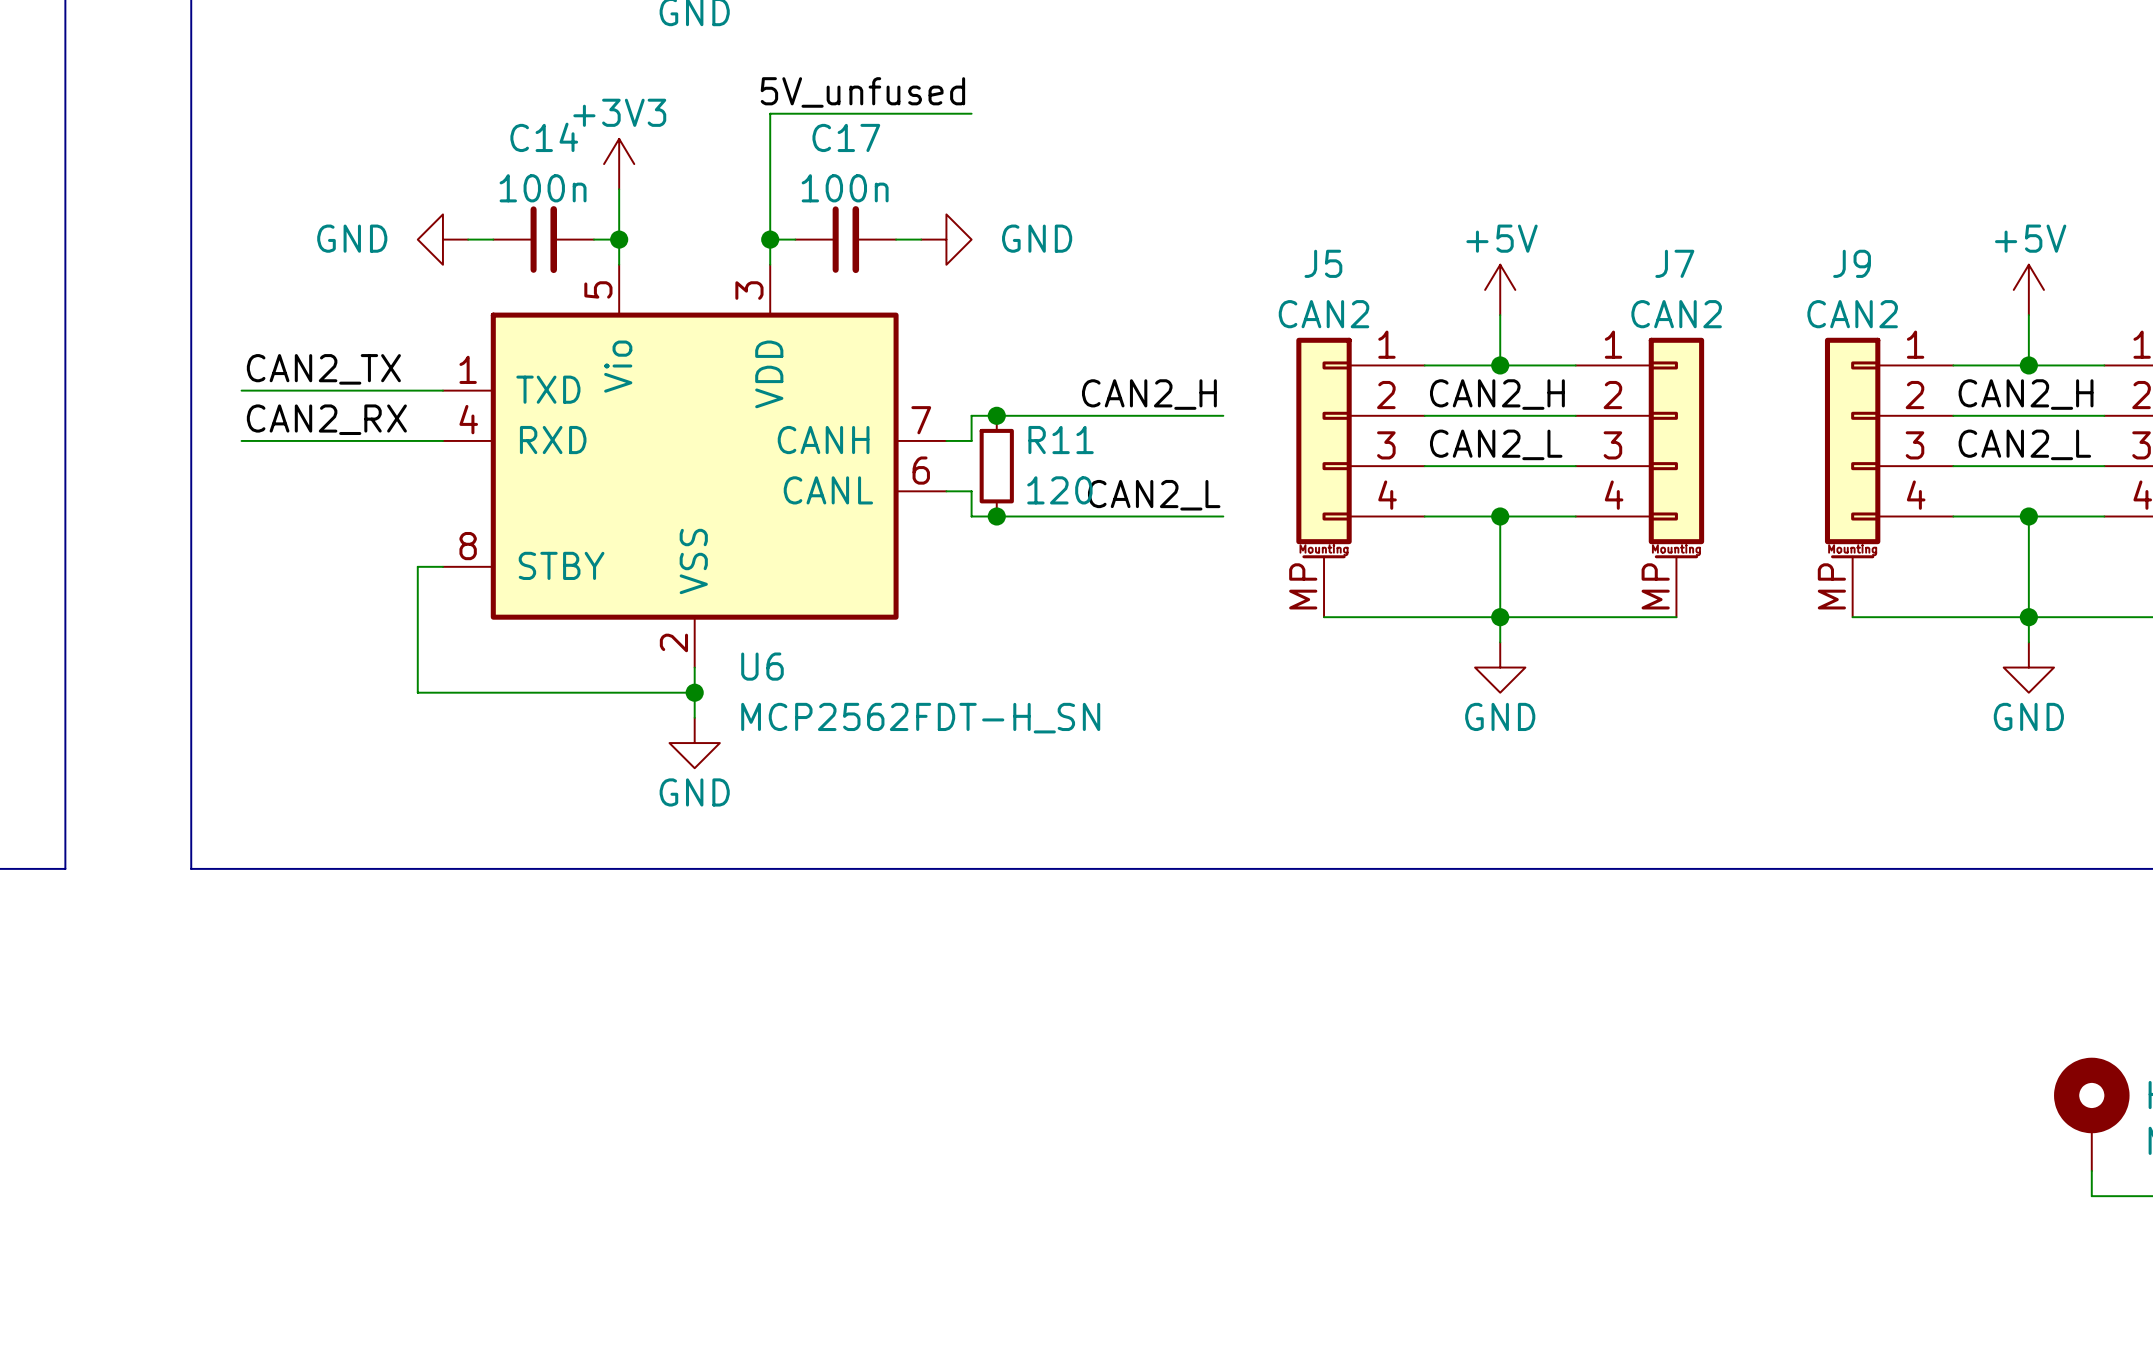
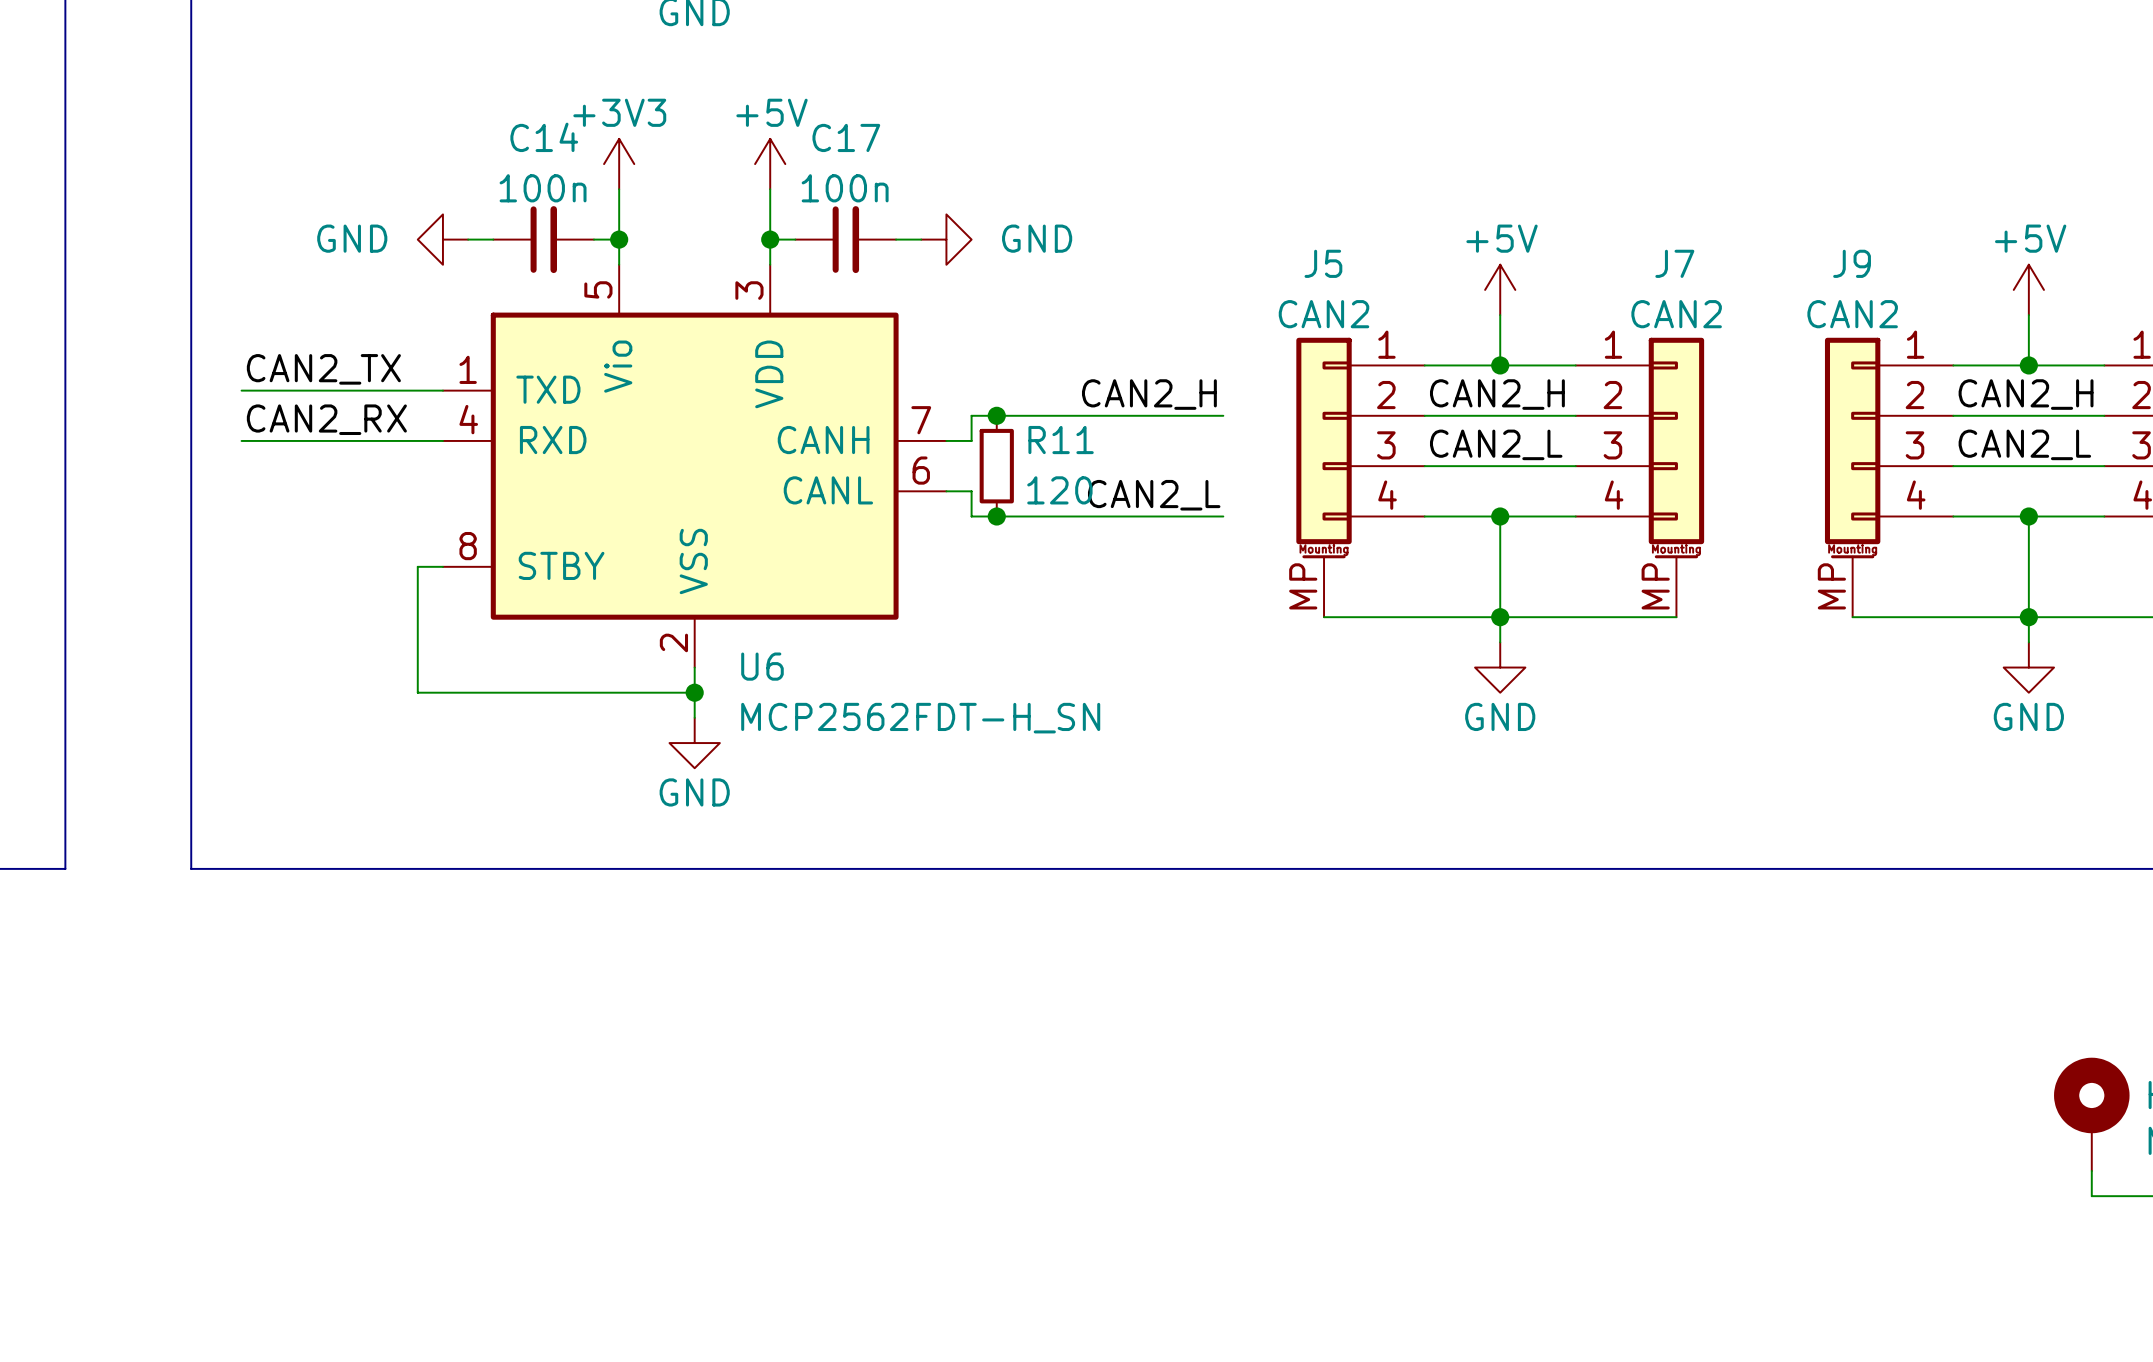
label: 5V_unfused (862, 92) -> none
wire: (971, 113) (770, 113) (770, 189) -> none
power symbol: none -> +5V (770, 164)

